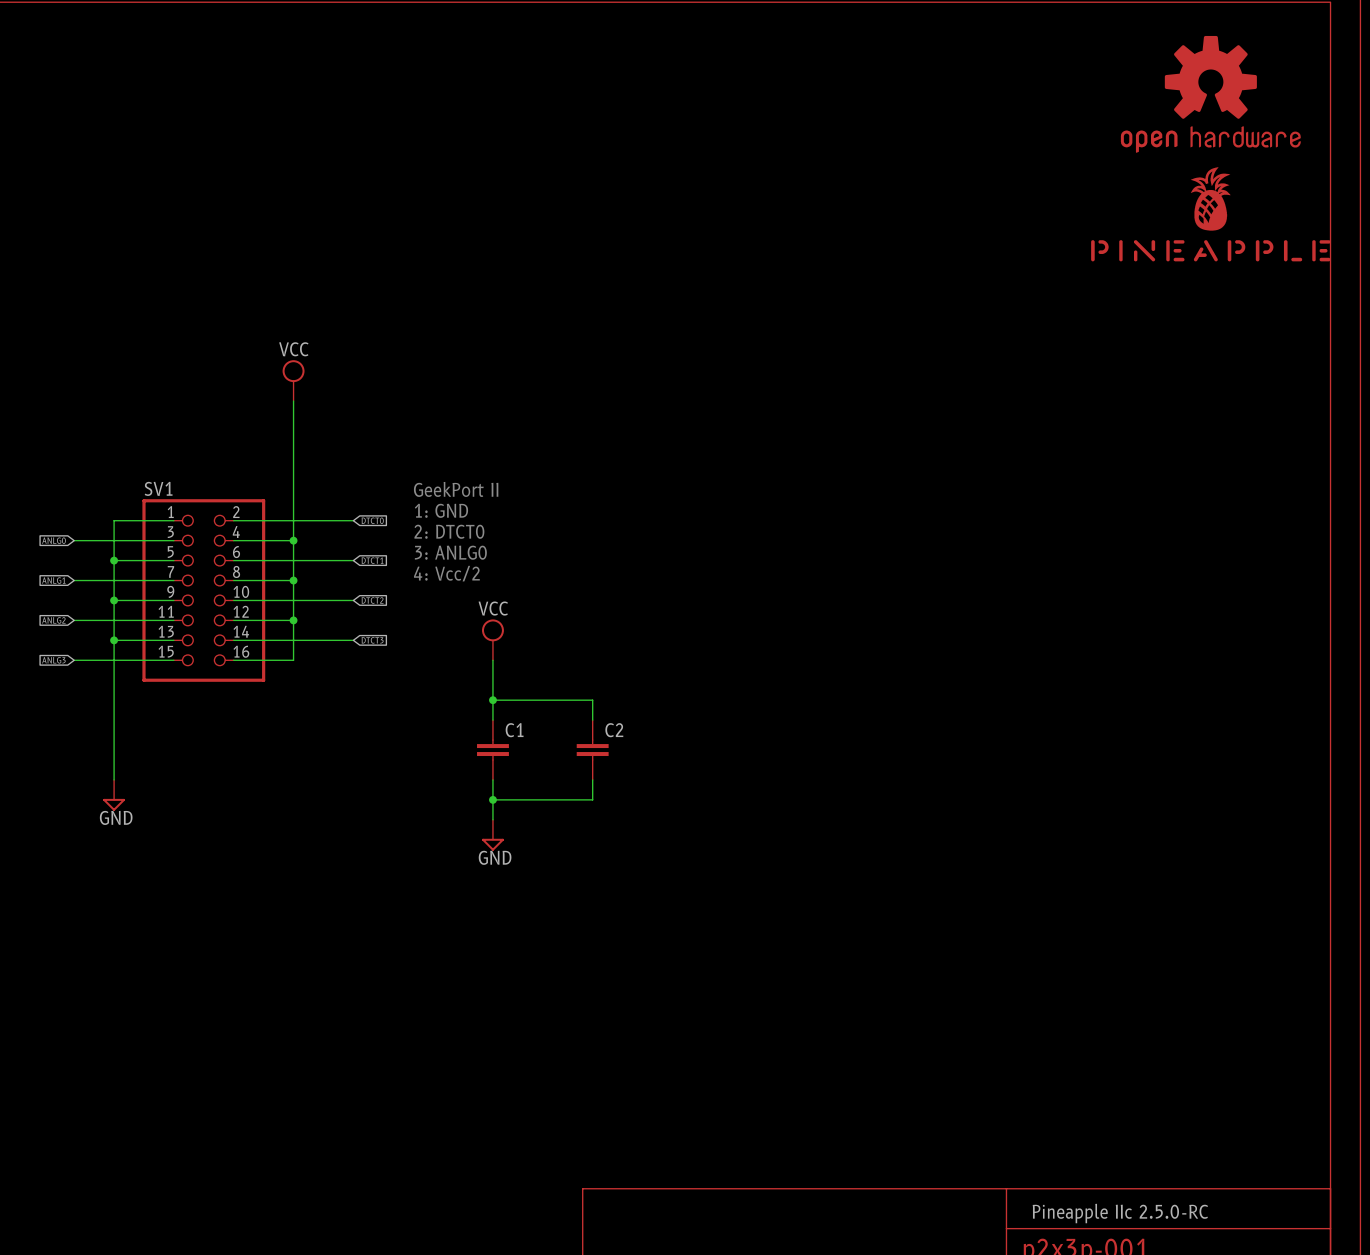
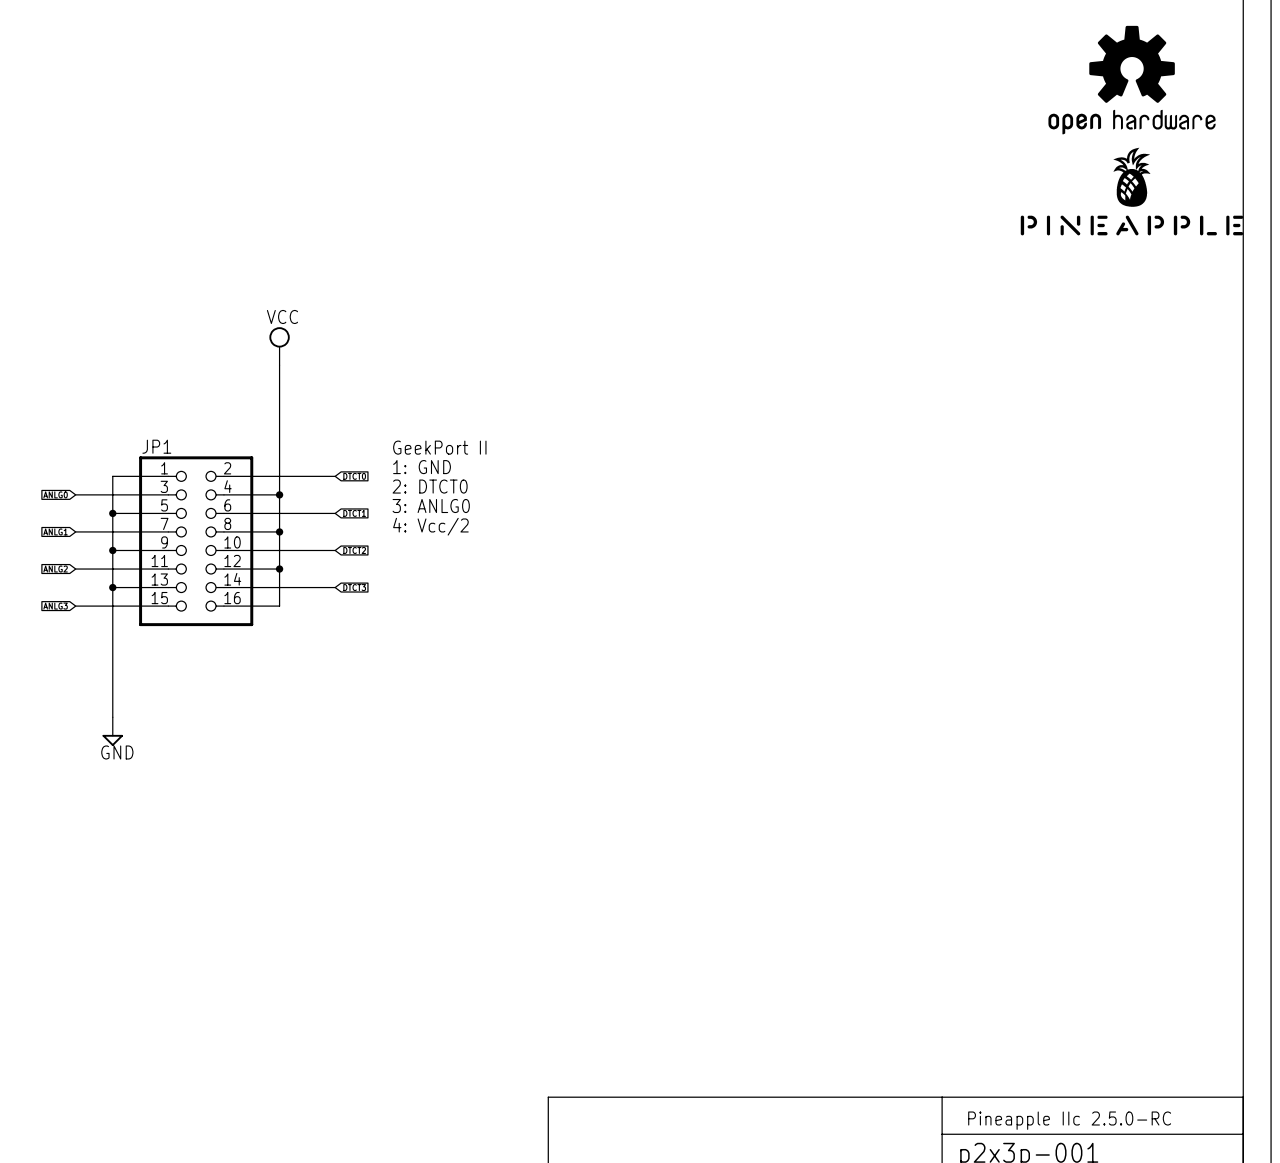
SV1 name: SV1 (158, 488) -> JP1 (156, 446)
power symbol: VCC (492, 639) -> none
wire: (492, 660) (492, 720) -> none
wire: (492, 700) (592, 700) (592, 720) -> none
junction: (492, 700) -> none
C1: (492, 750) -> none
C2: (592, 750) -> none
wire: (492, 779) (492, 819) -> none
wire: (592, 779) (592, 799) (492, 799) -> none
junction: (492, 799) -> none
power symbol: GND (492, 835) -> none

